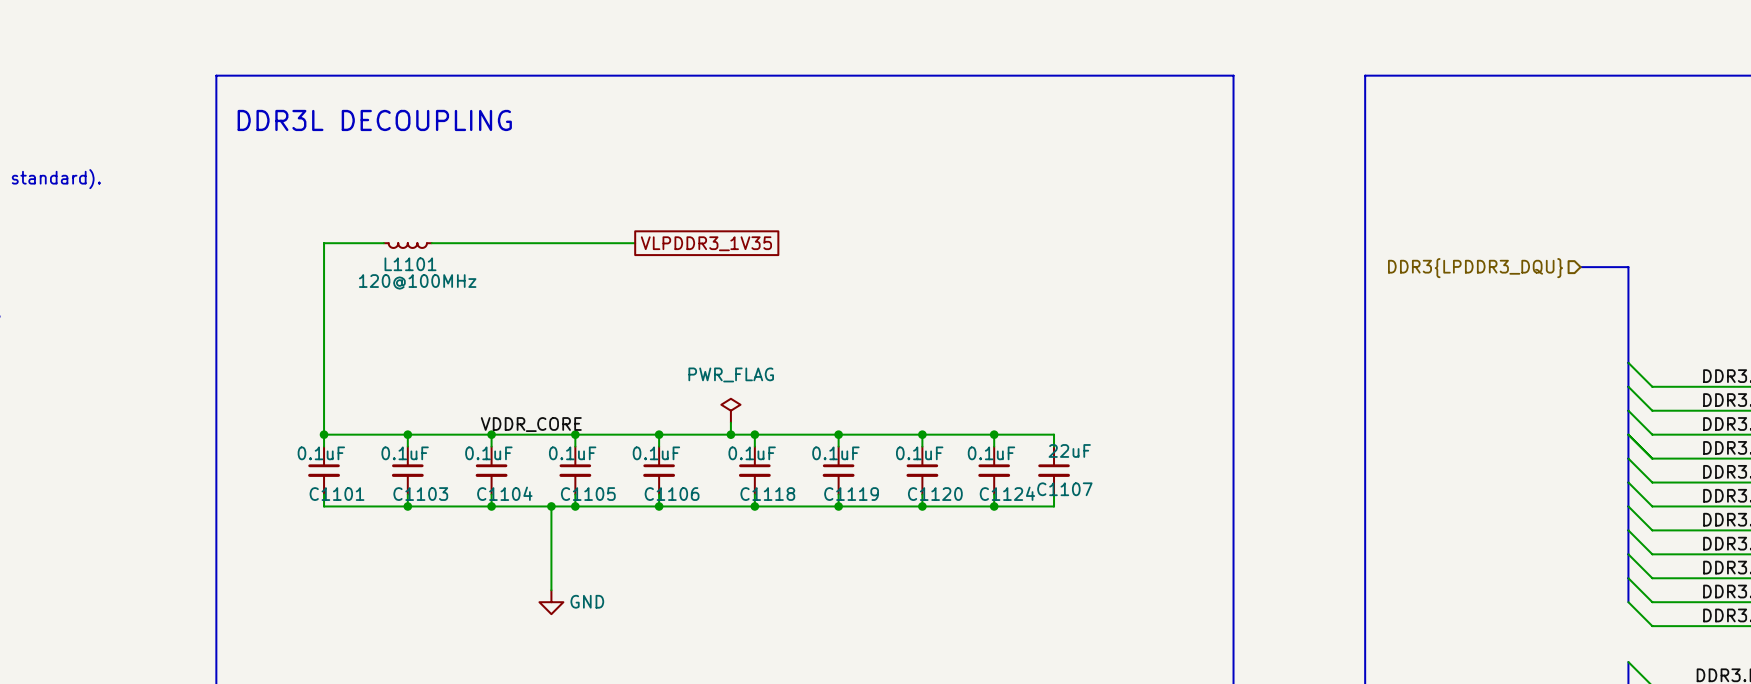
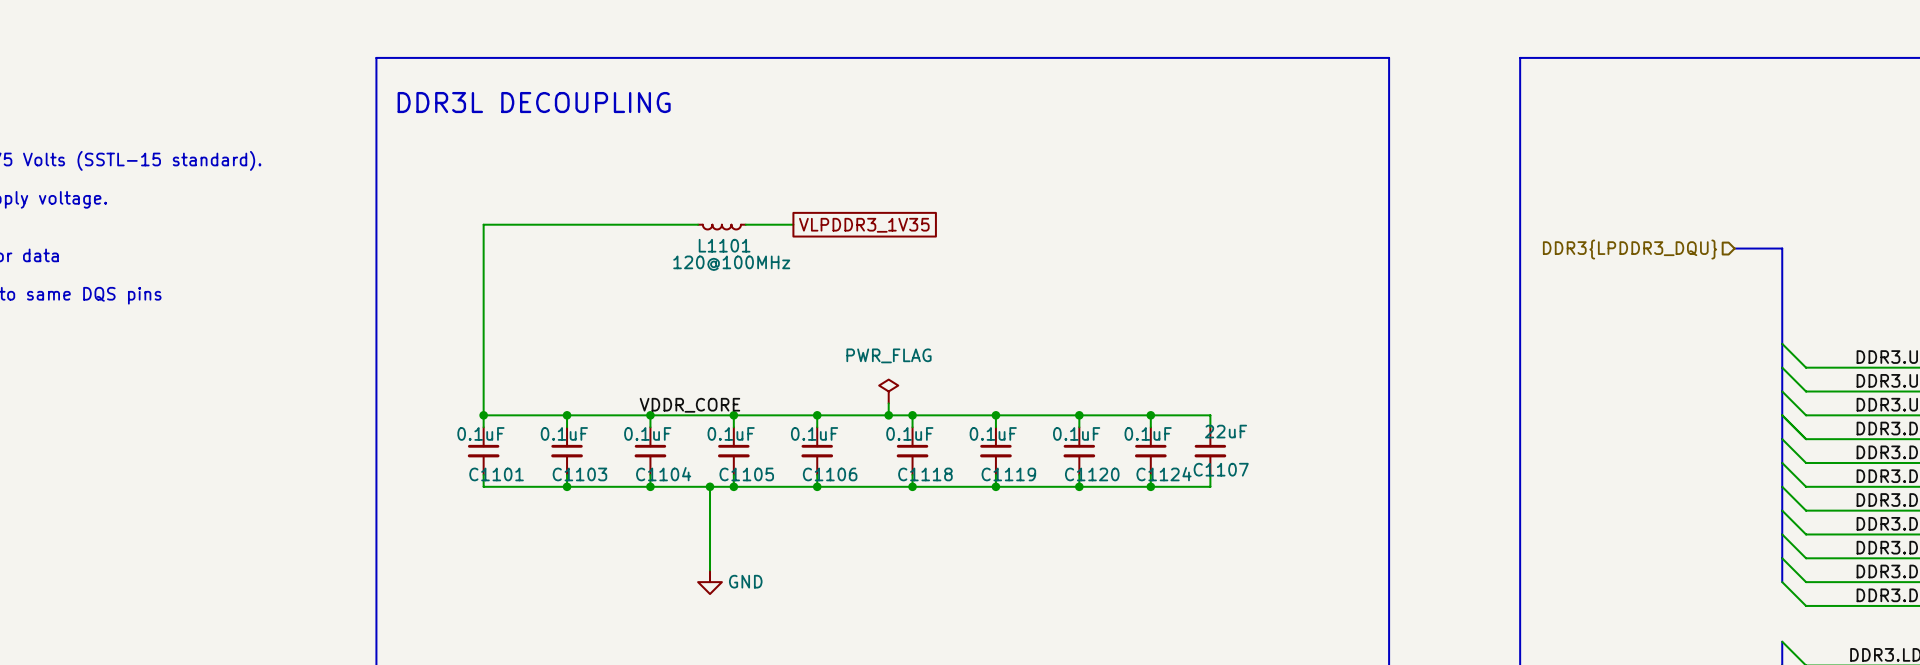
wire: (539, 243) (587, 243) -> (543, 224) (590, 224)
L1101 position: (407, 245) -> (721, 227)

